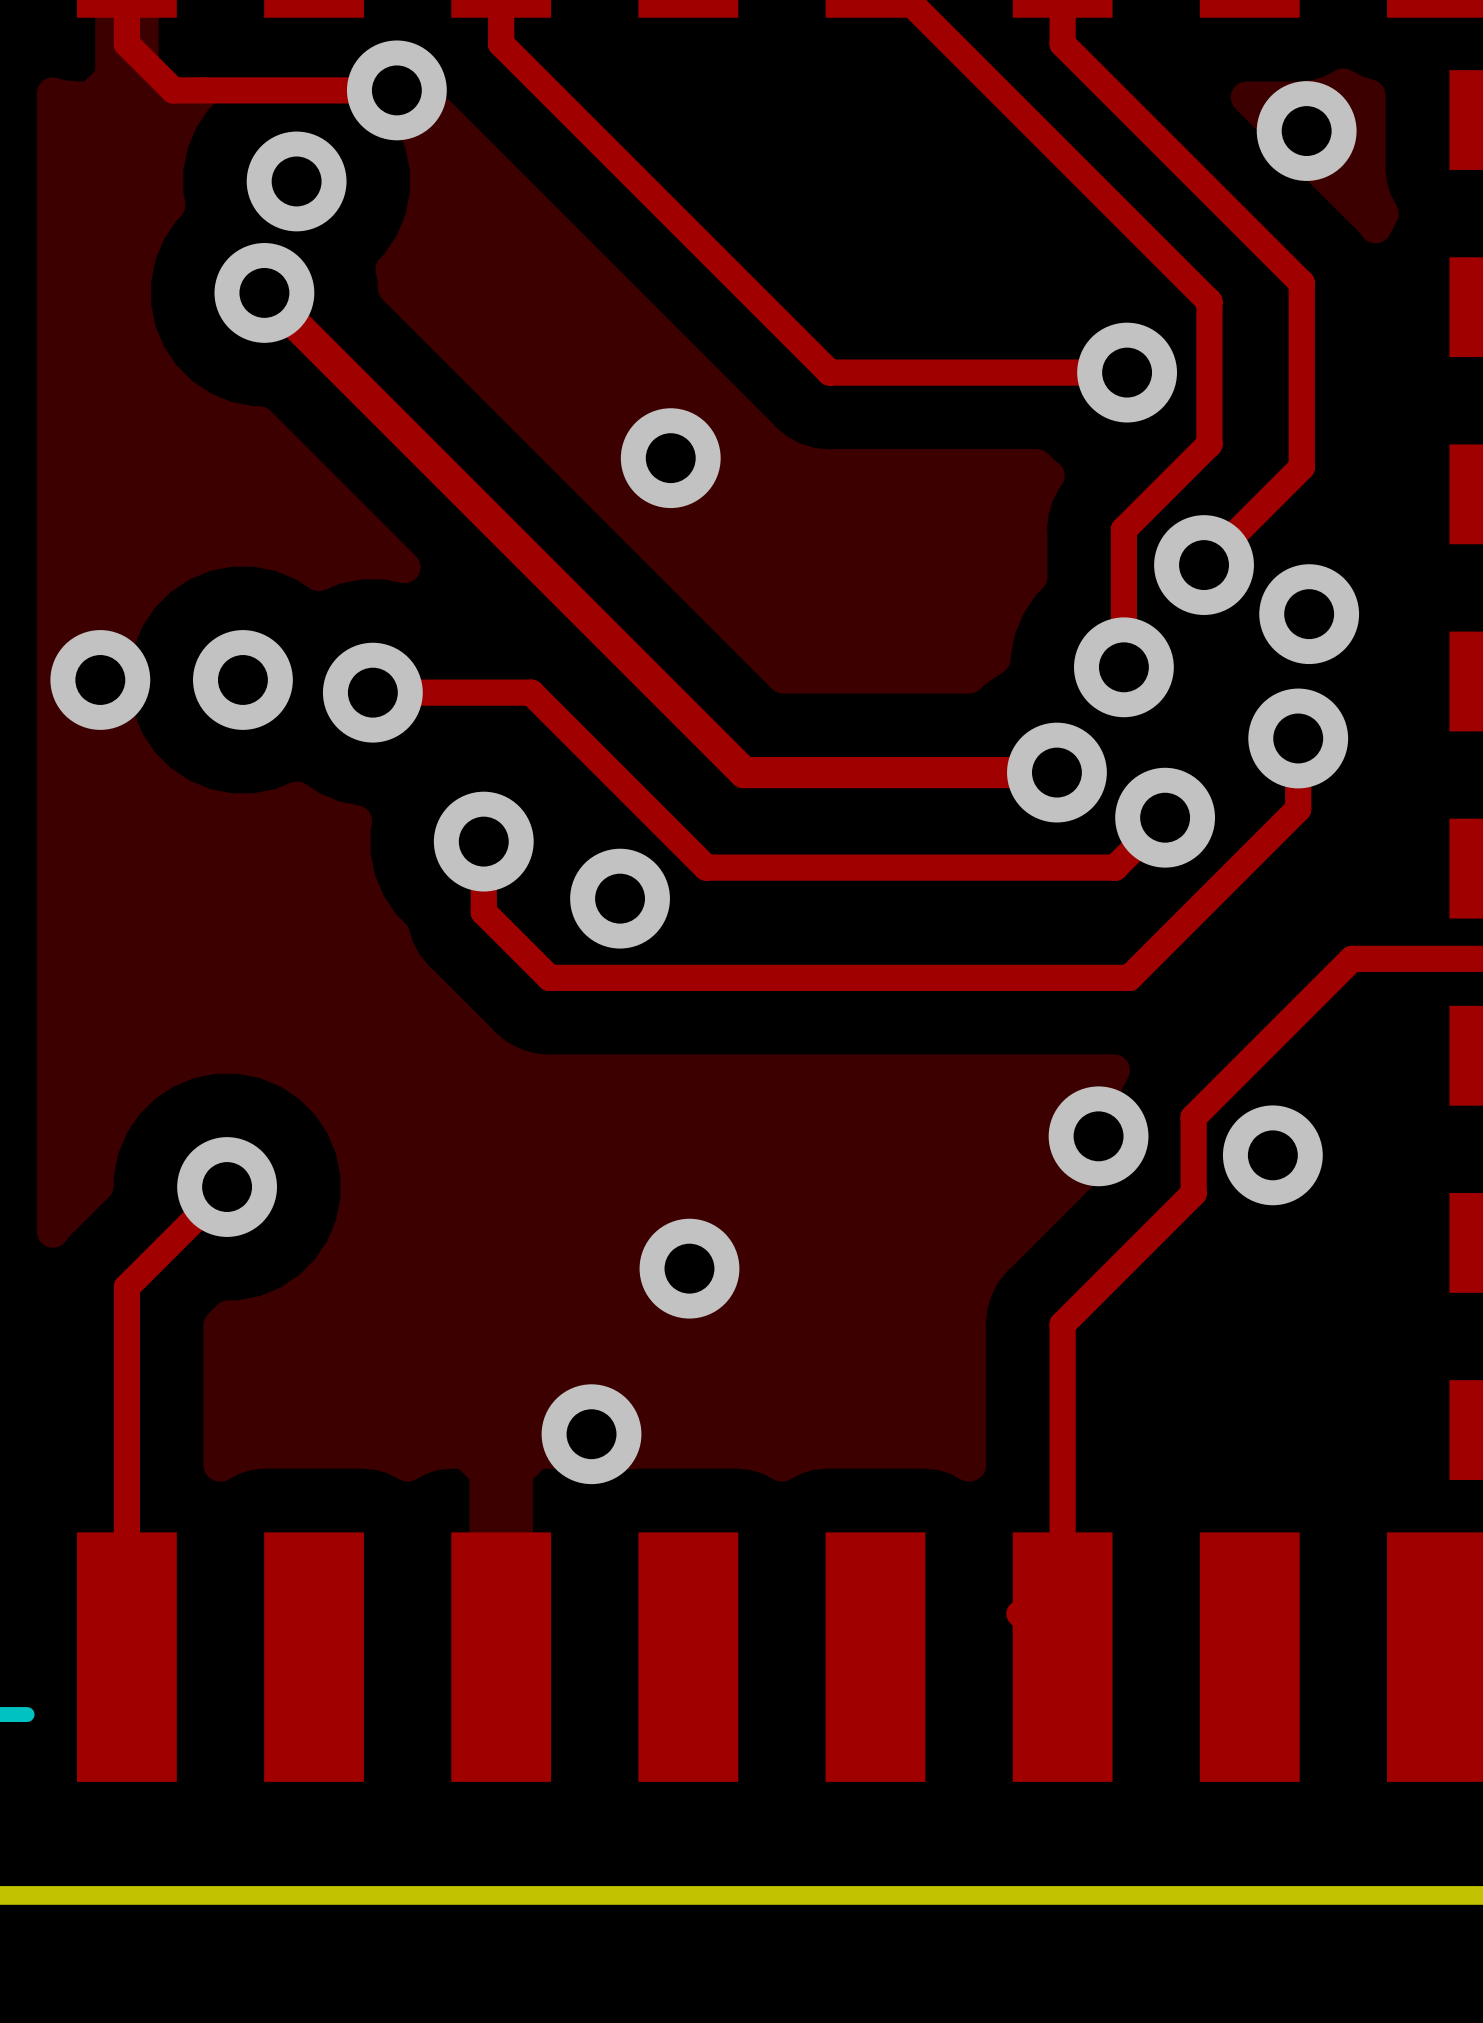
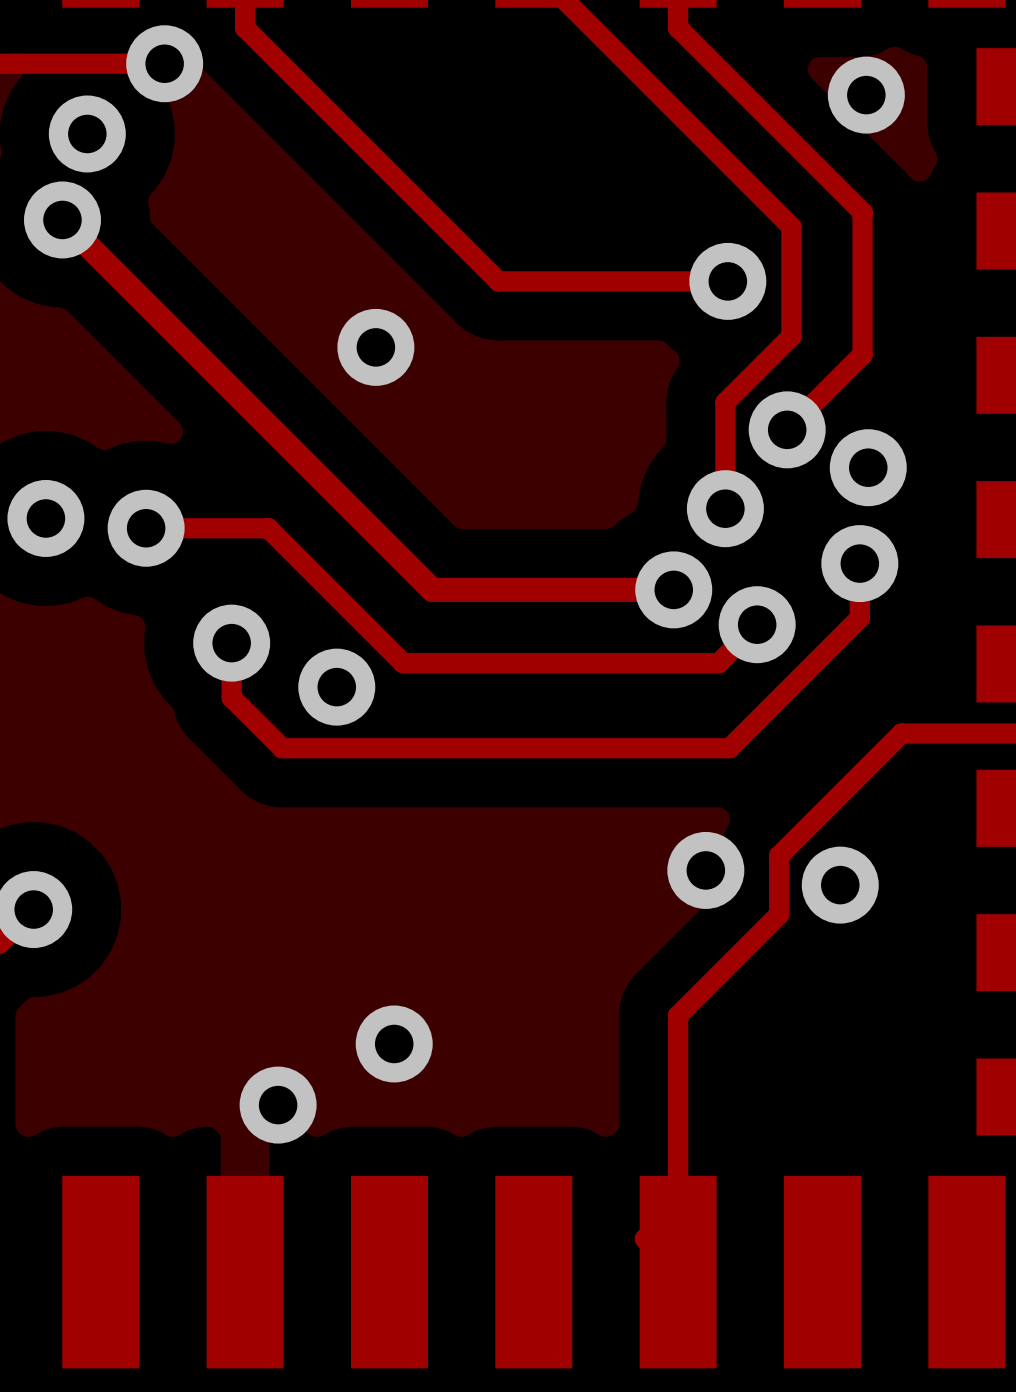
via position: (689, 1268) -> (394, 1043)
via position: (591, 1434) -> (278, 1105)

